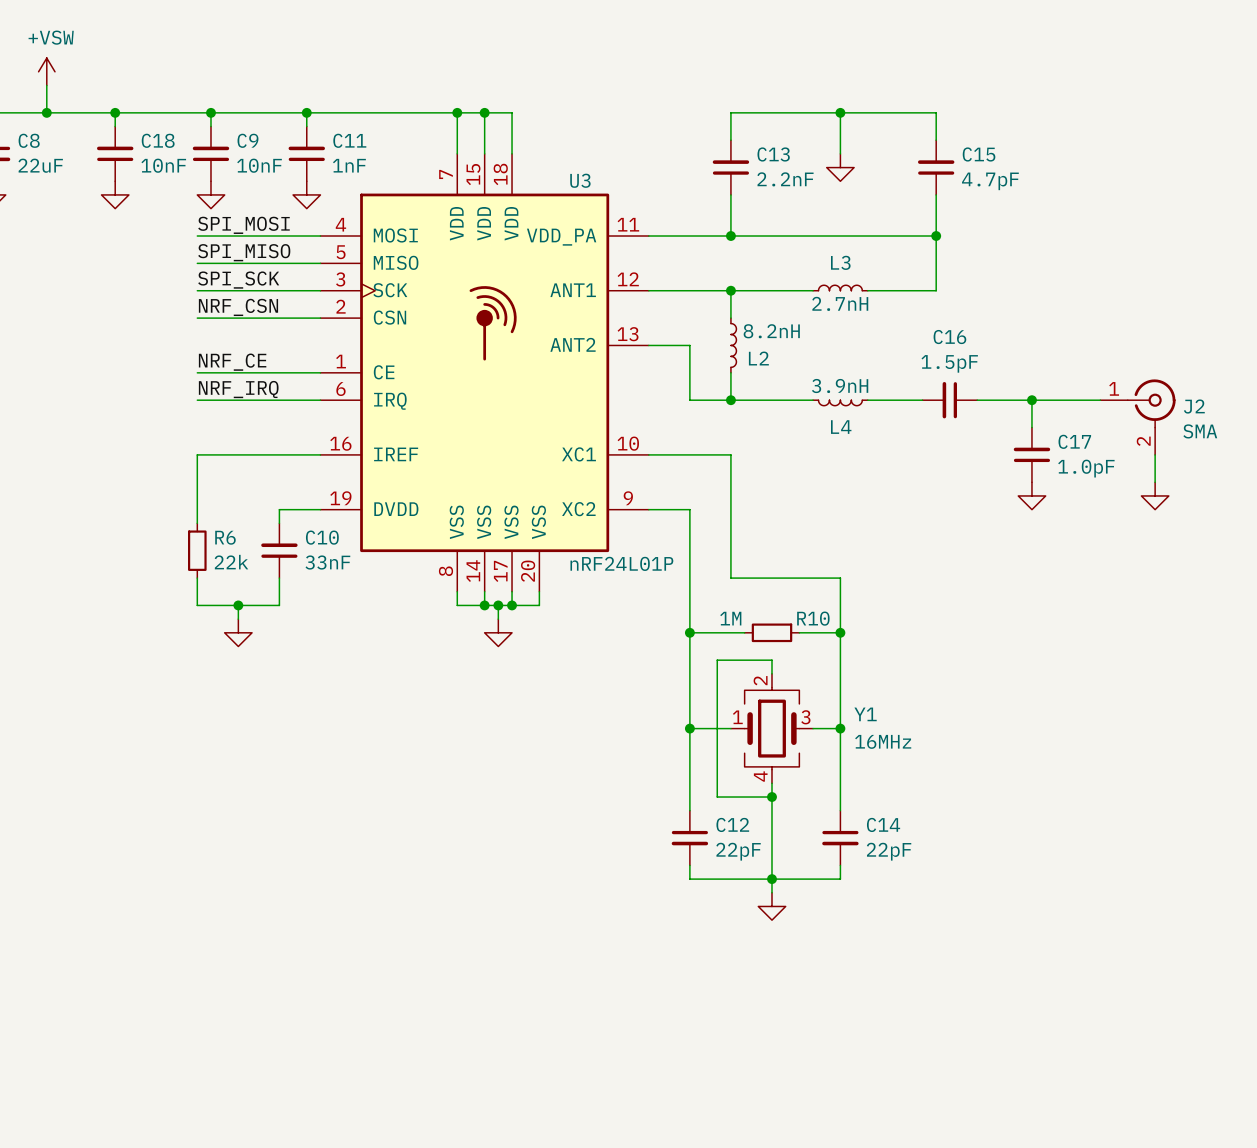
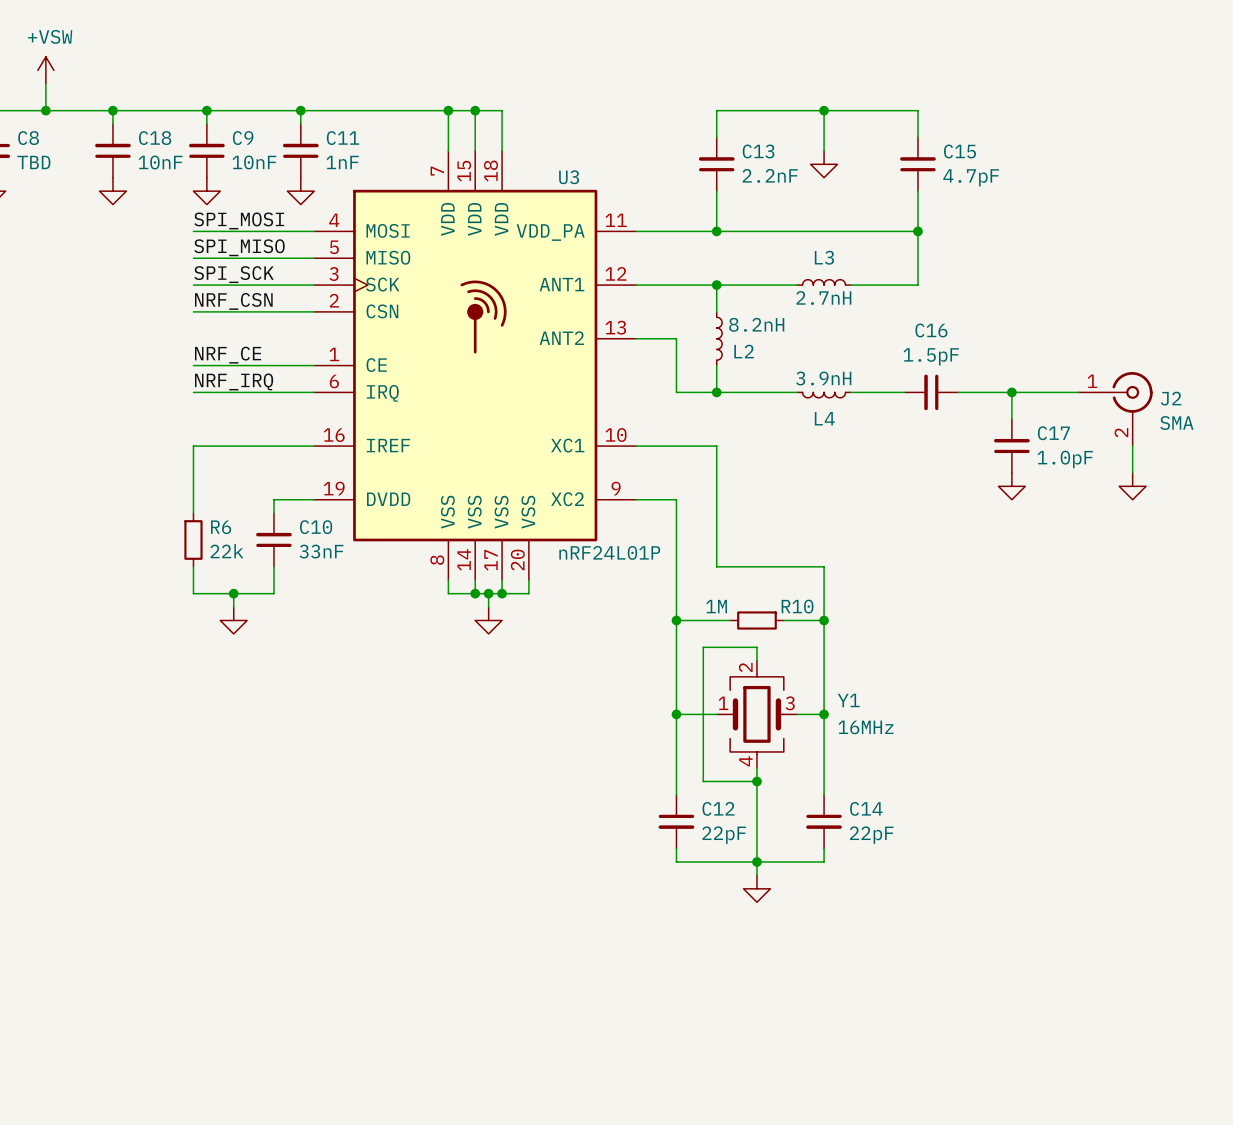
C8 value: 22uF (40, 165) -> TBD (33, 162)

